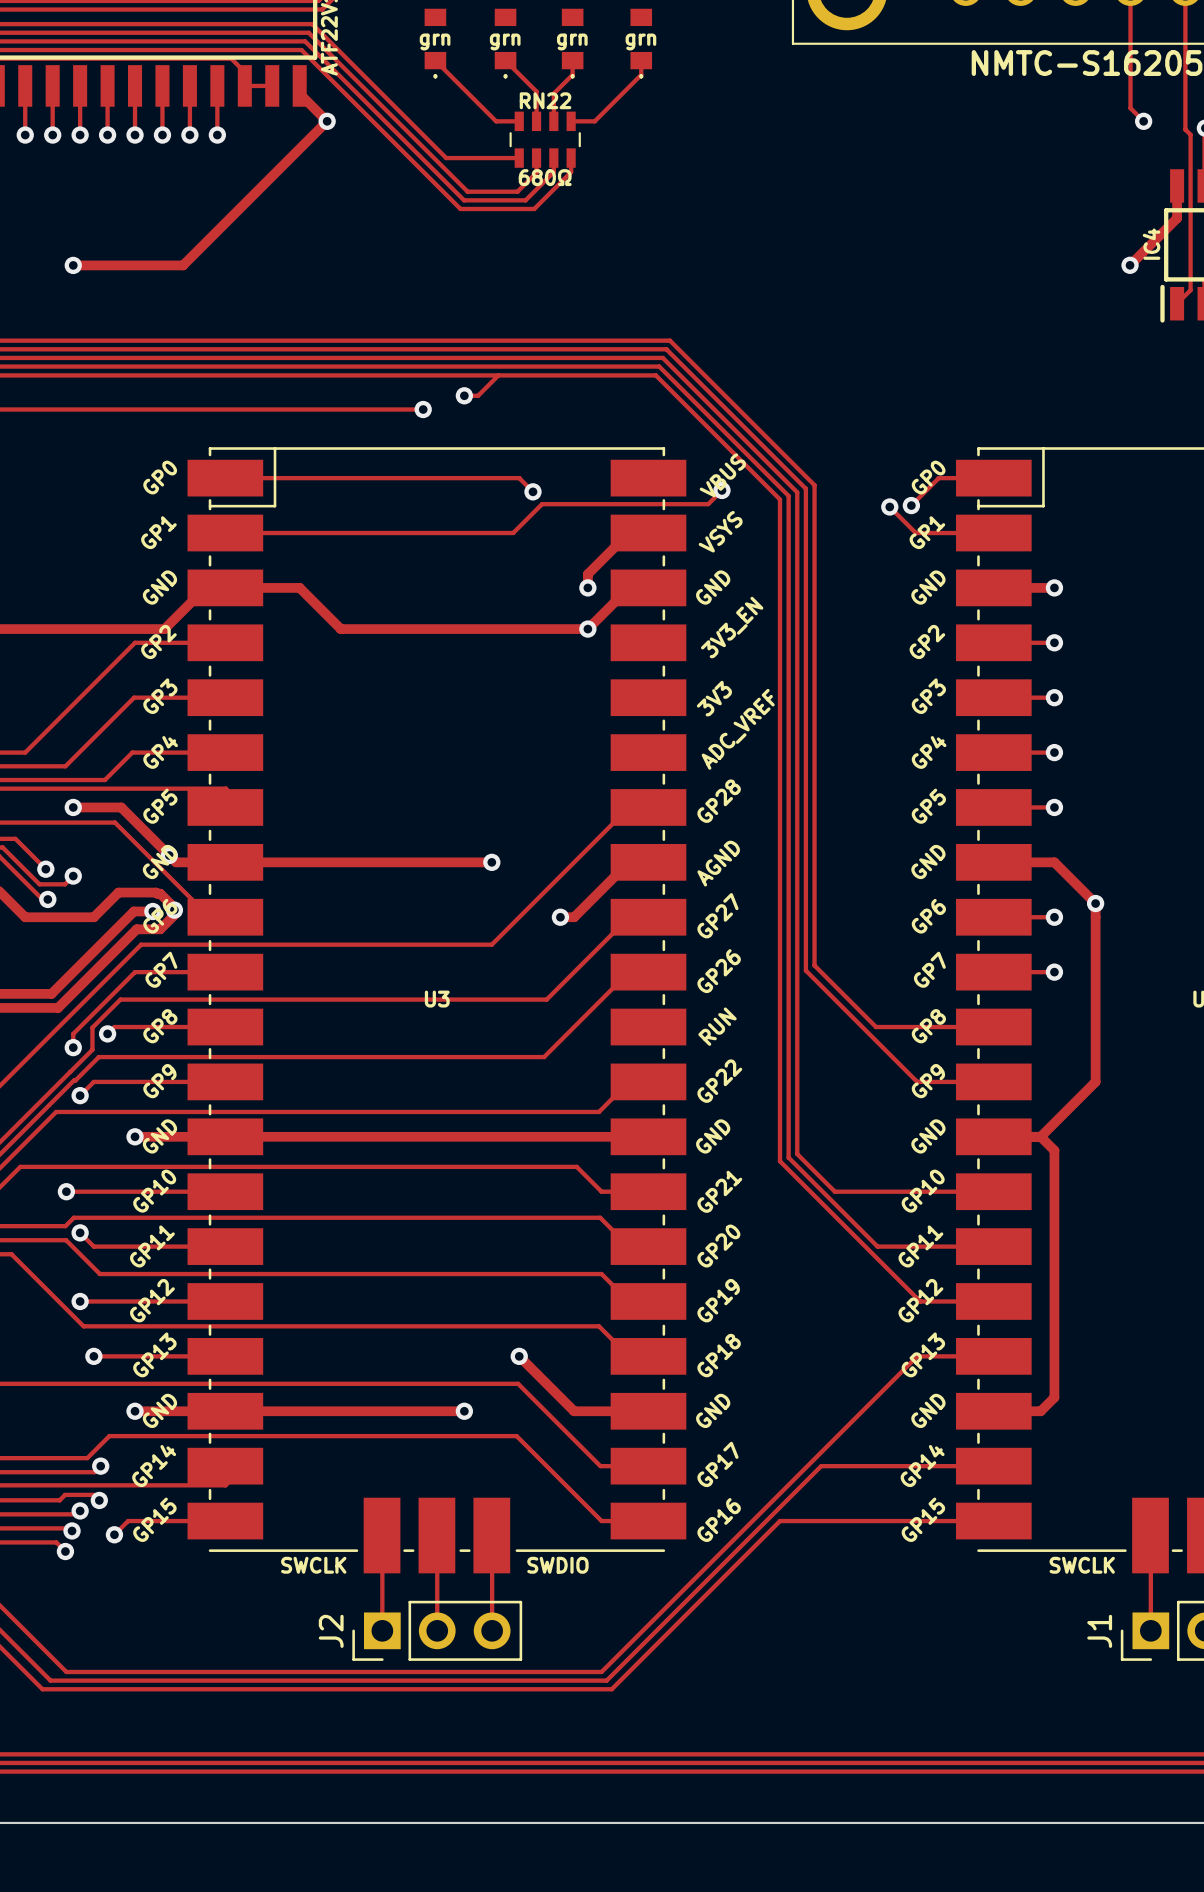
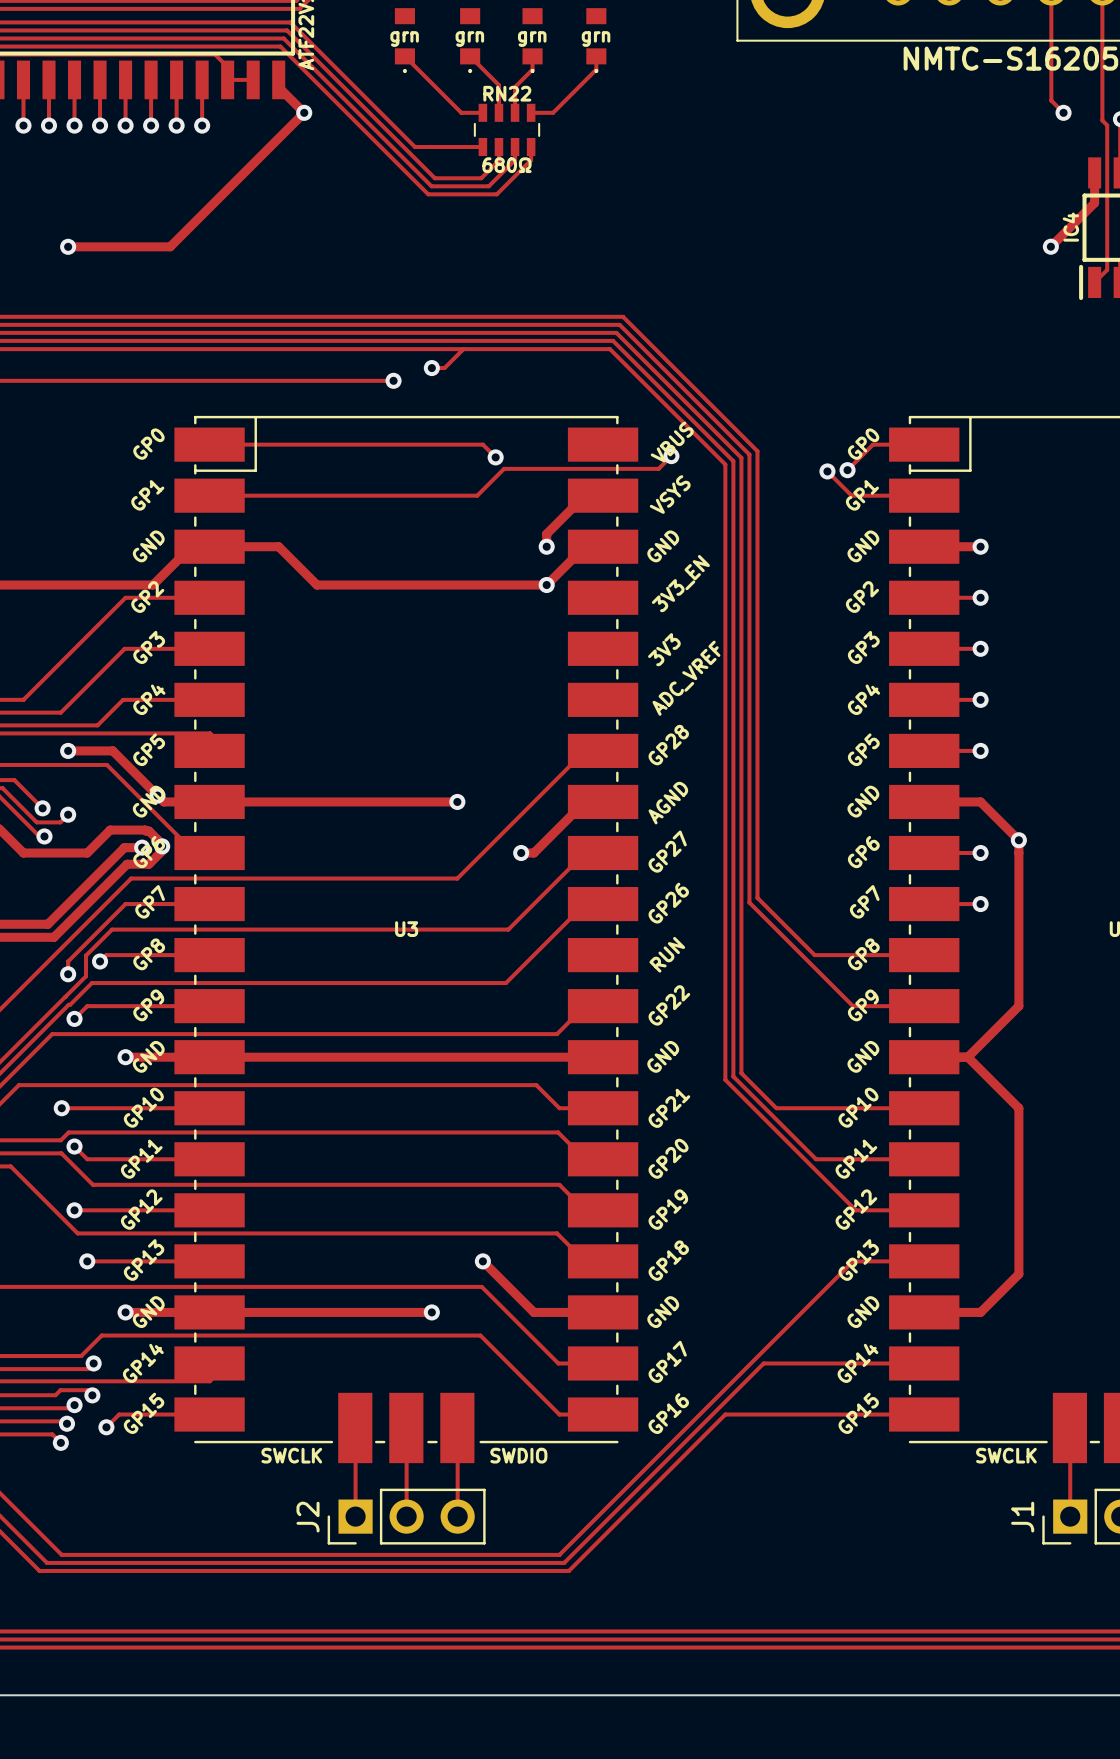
track: (1054, 1150) (1054, 1397) (1040, 1411) -> (980, 1069) (1018, 1108) (1018, 1274) (980, 1312) (967, 1312)

